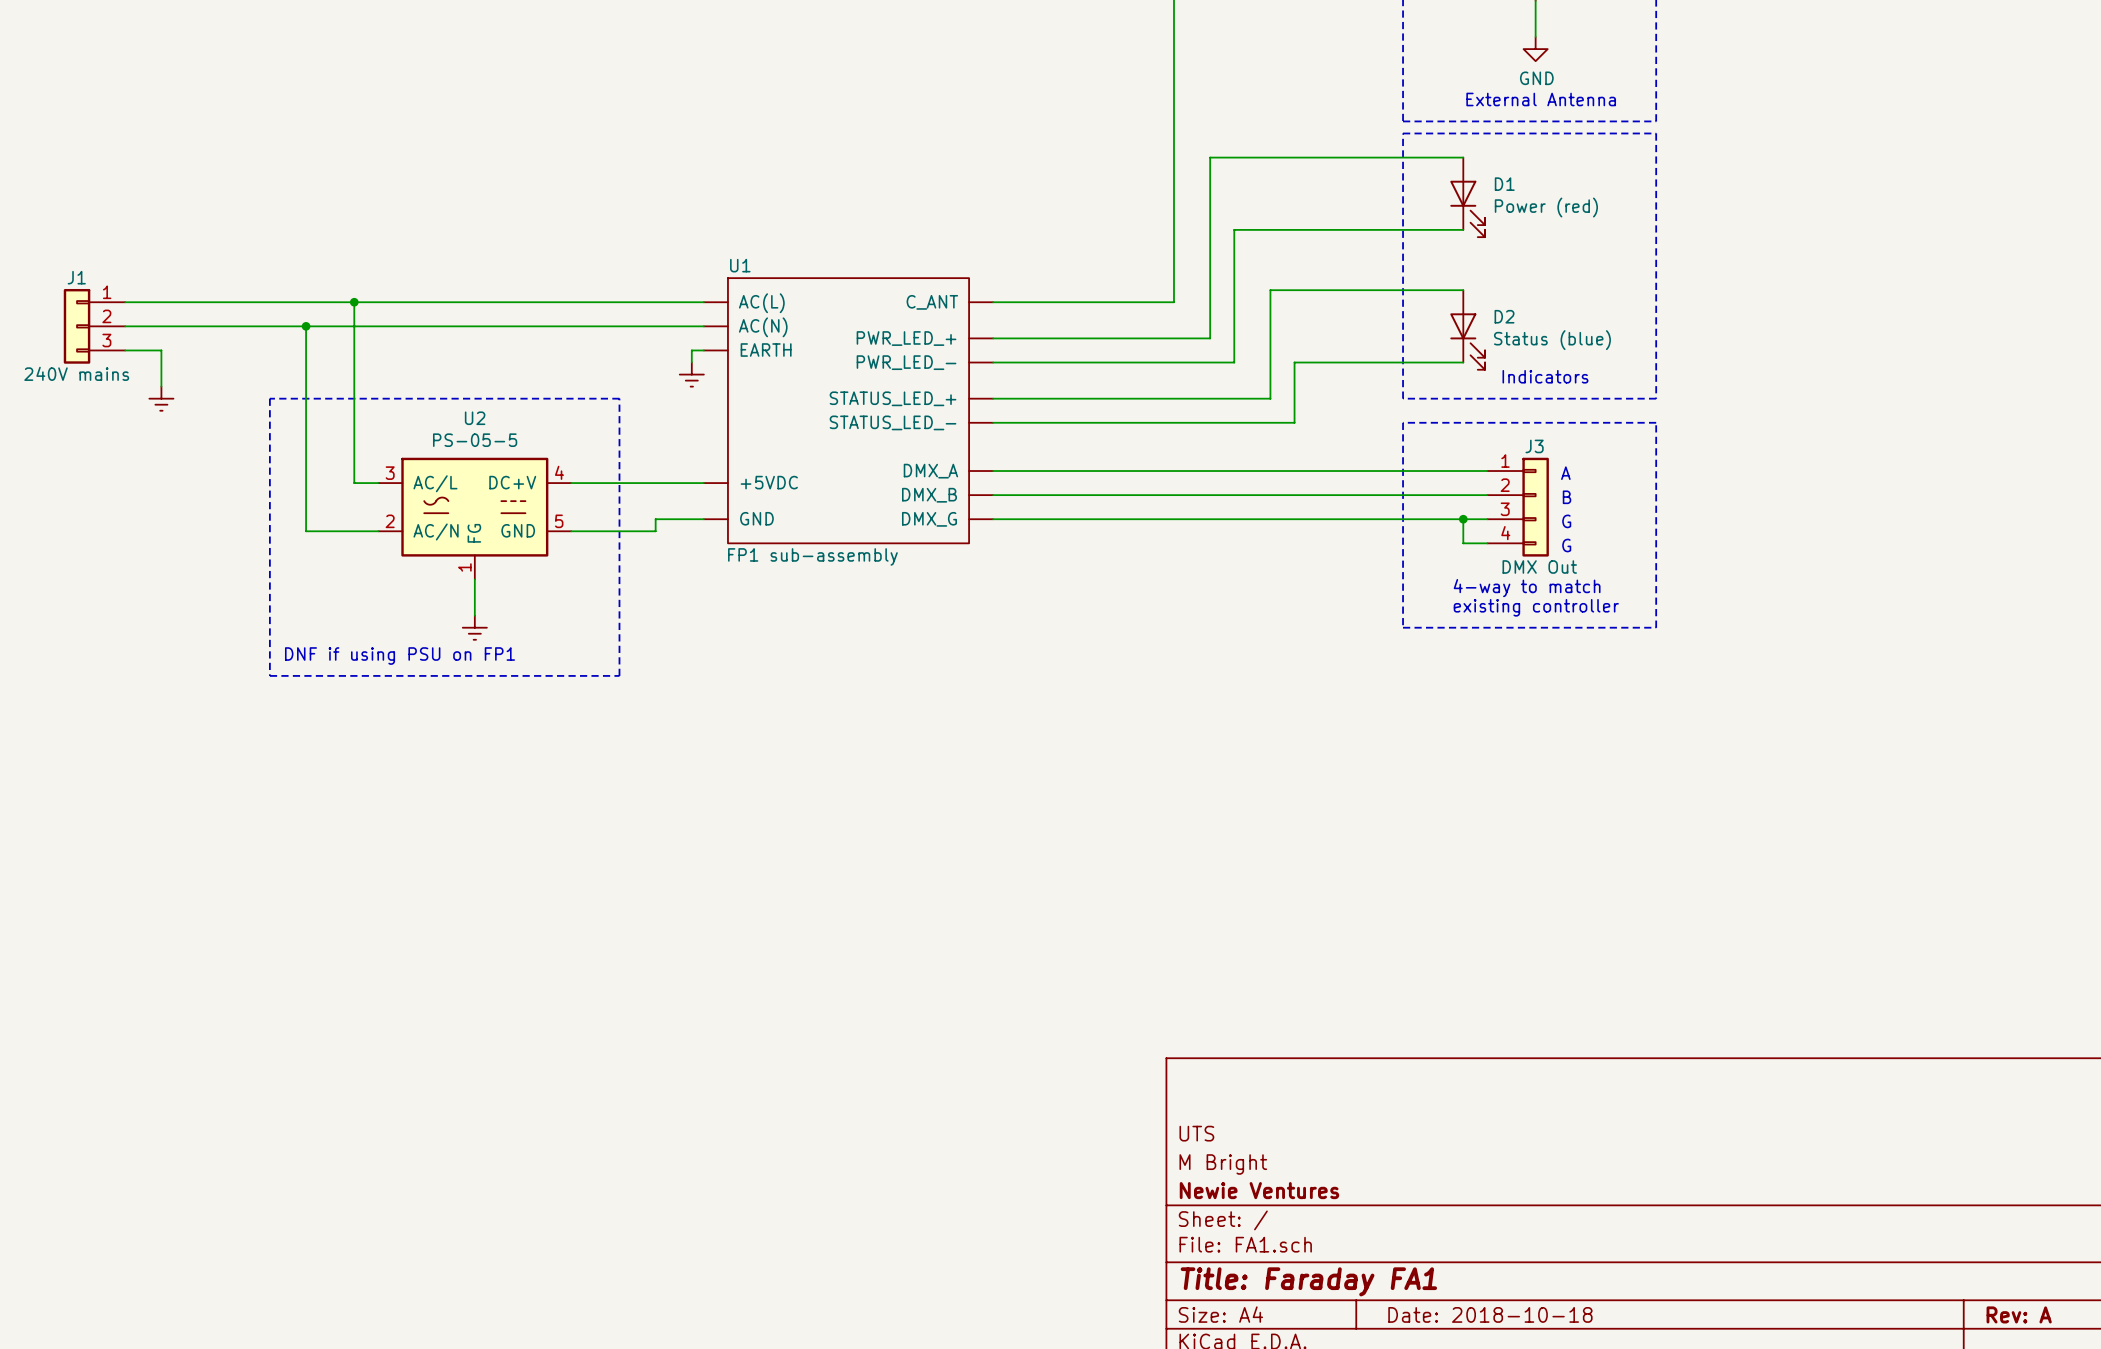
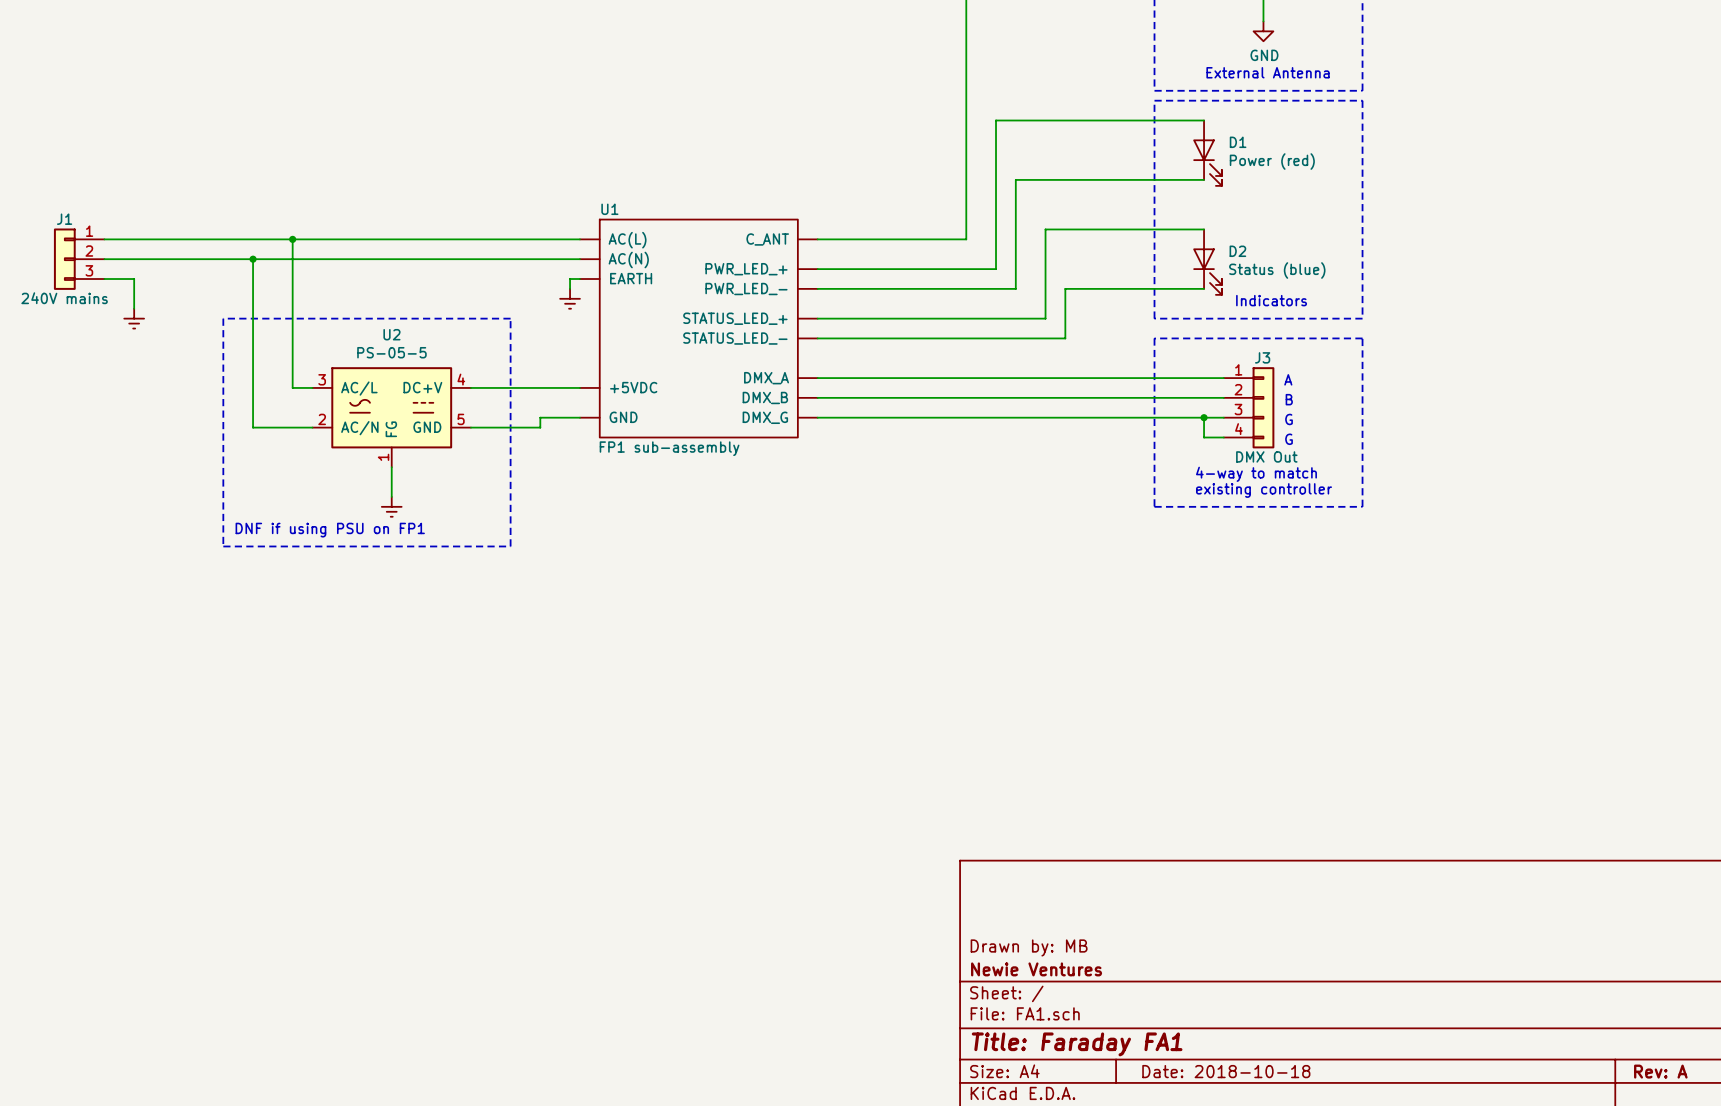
title block: UTS (1196, 1133) -> none
title block: M Bright (1223, 1164) -> Drawn by: MB (1029, 947)

